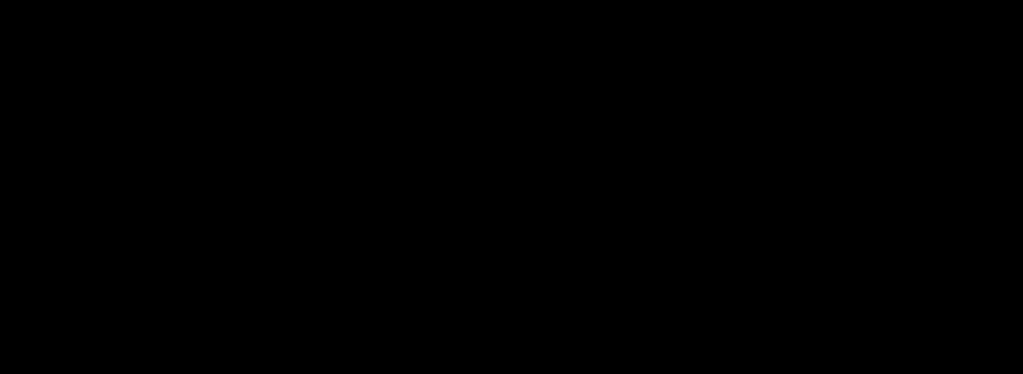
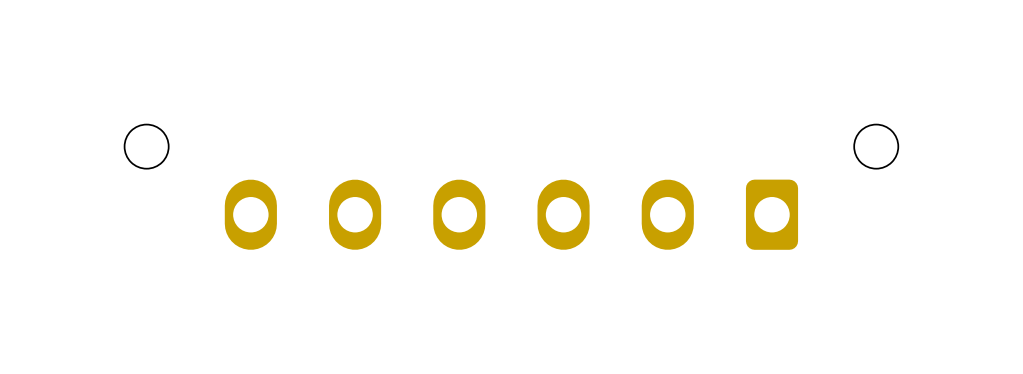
part: none -> (511, 187)

